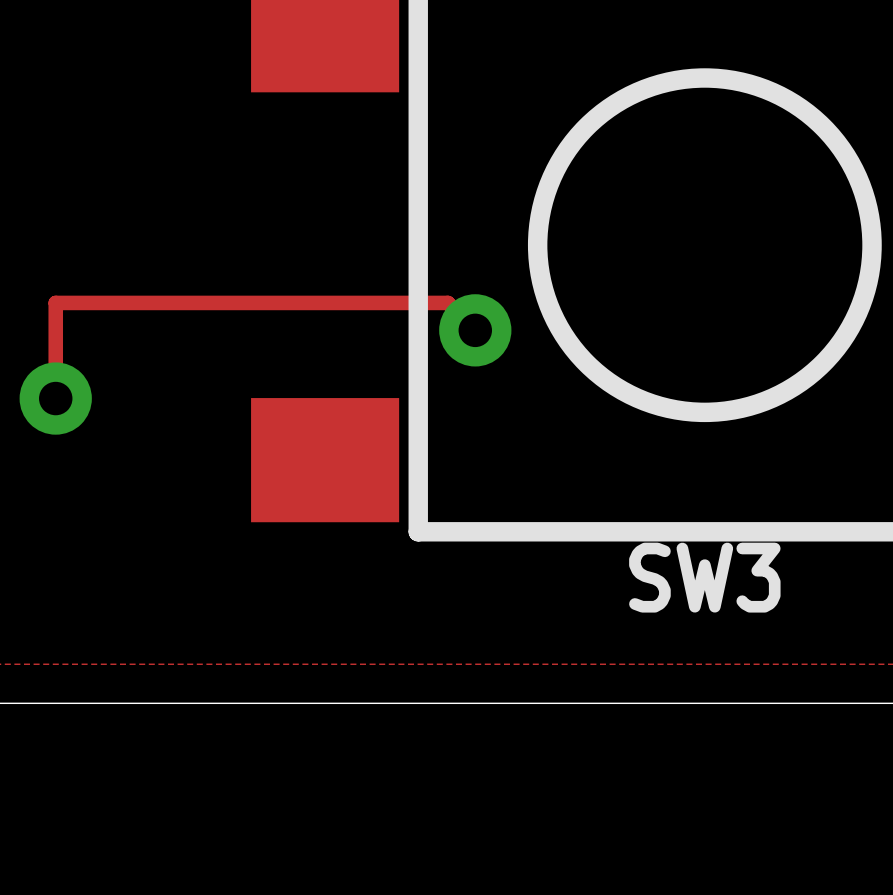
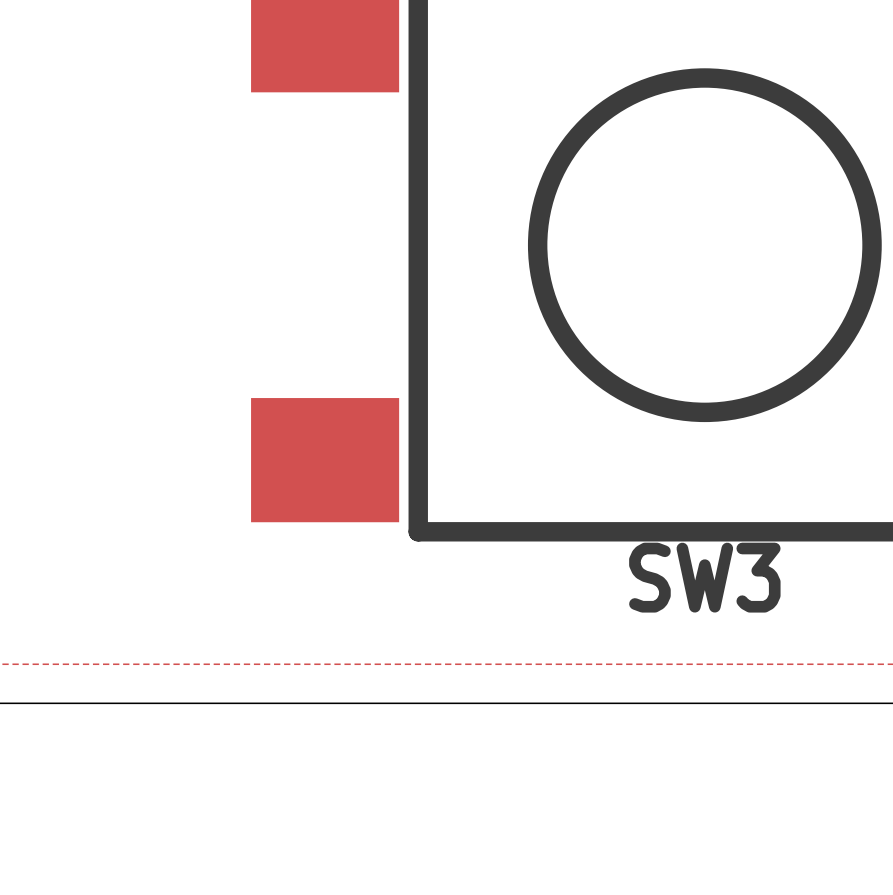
track: (475, 330) (447, 302) (55, 302) (55, 398) -> none
via: (475, 330) -> none
via: (55, 398) -> none

